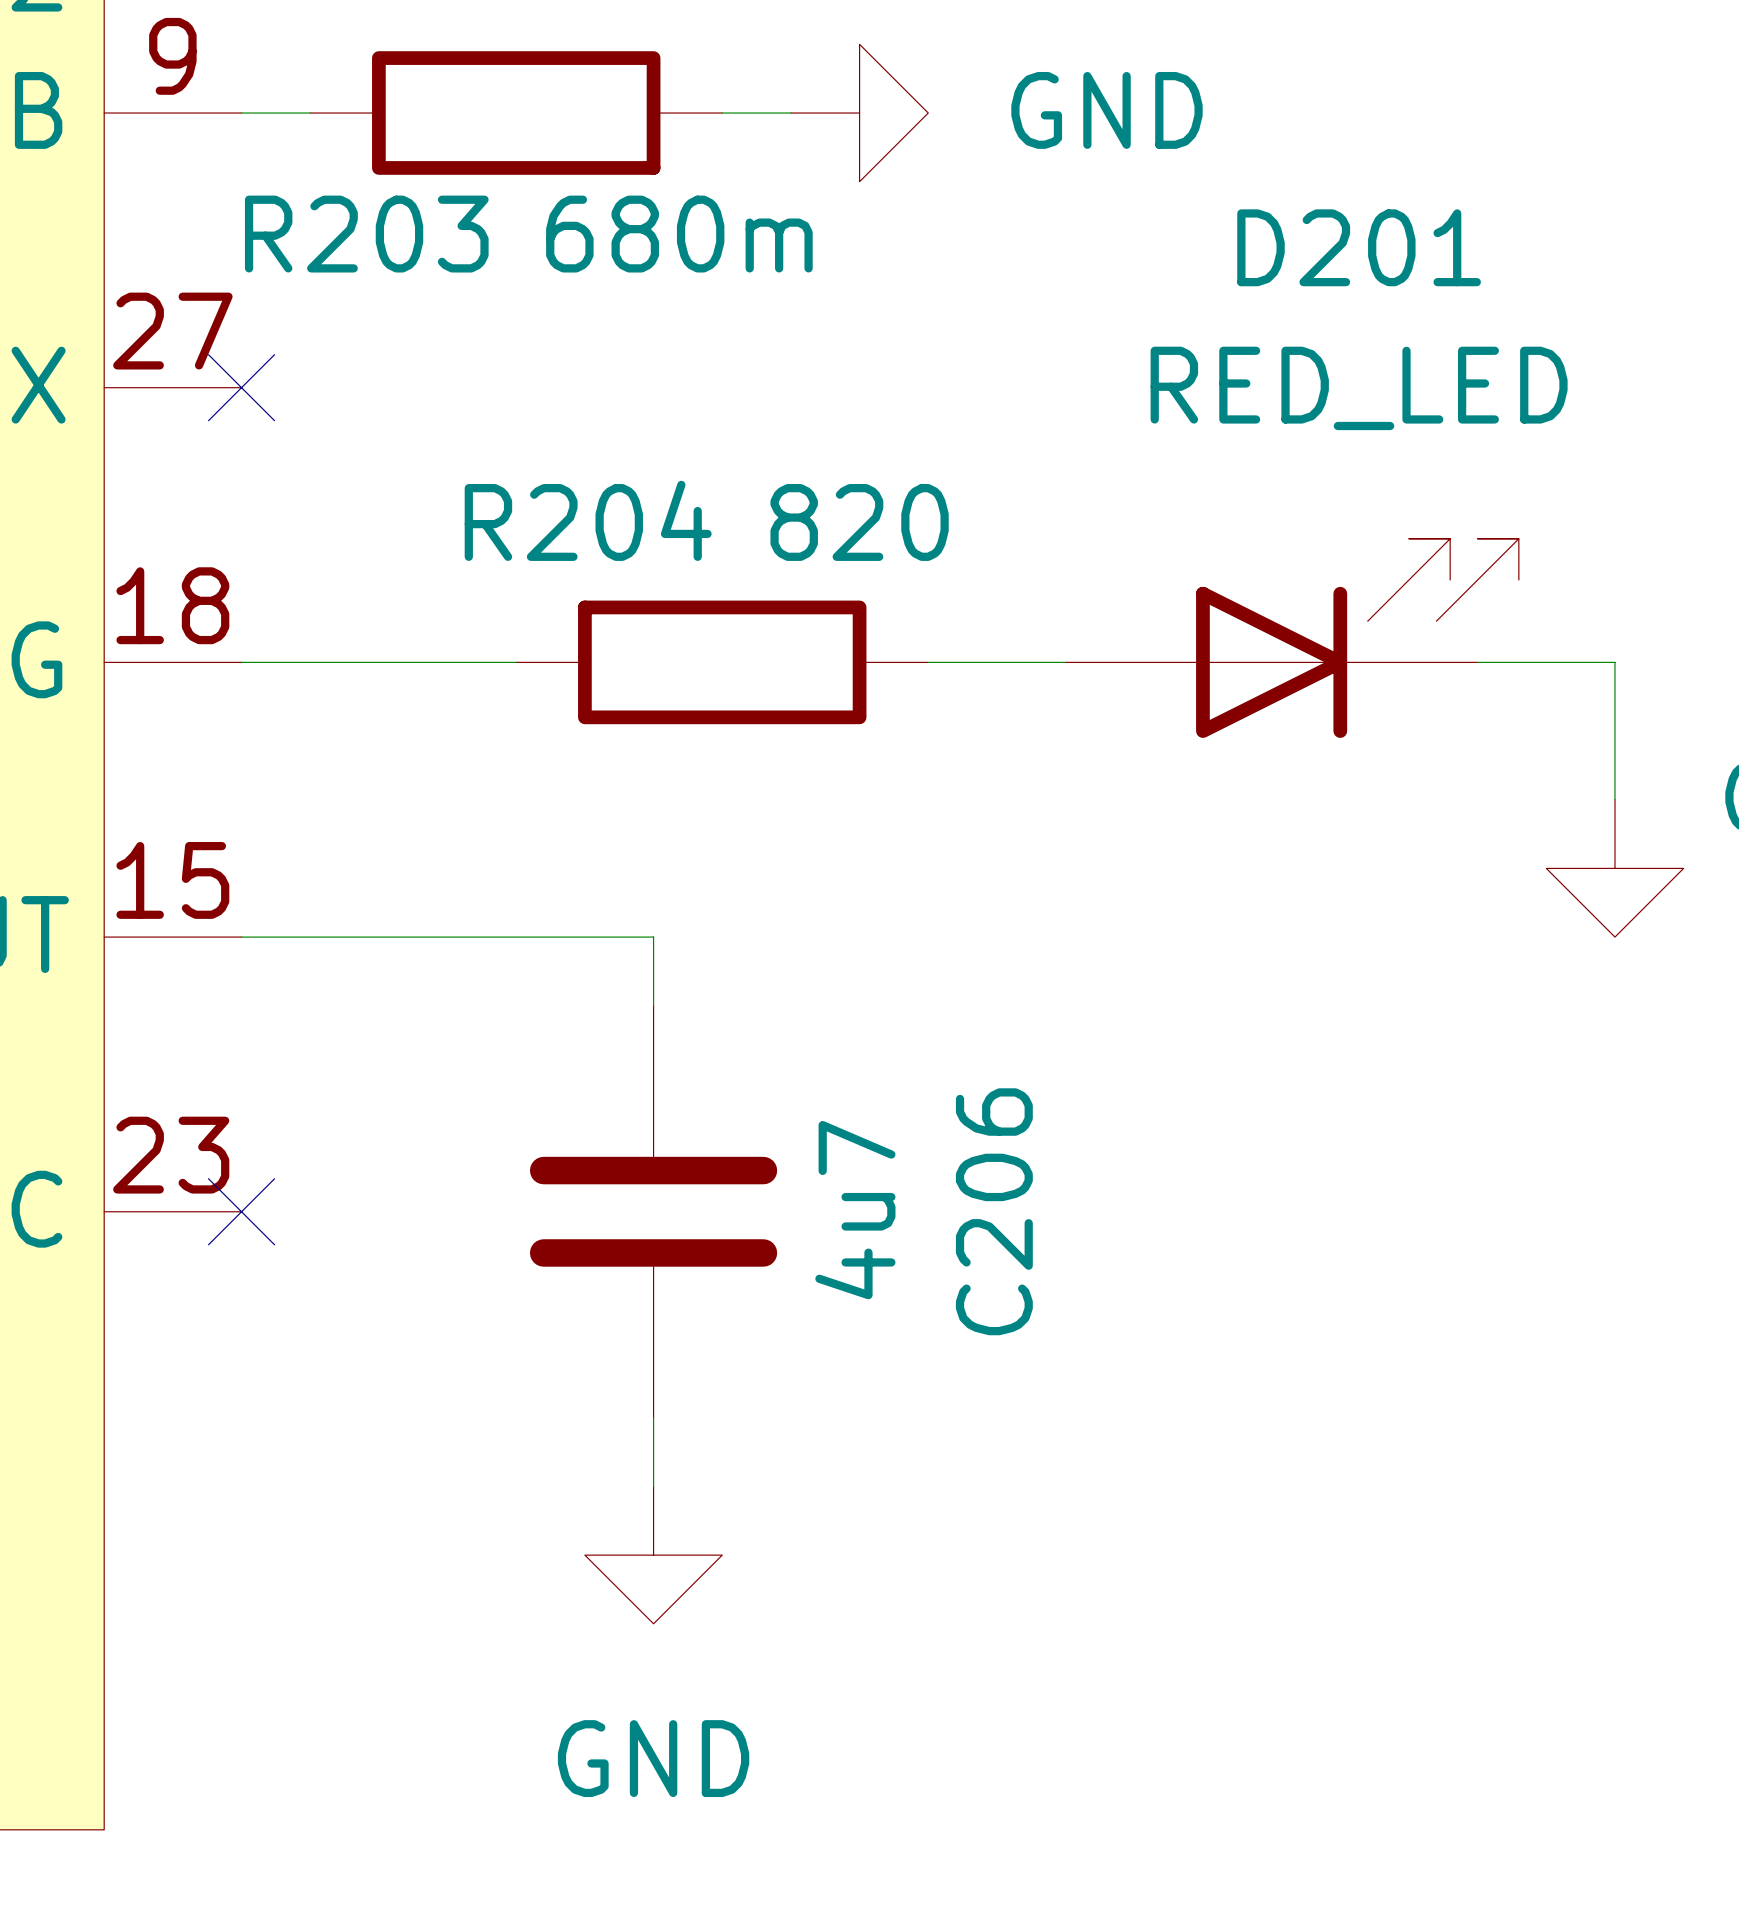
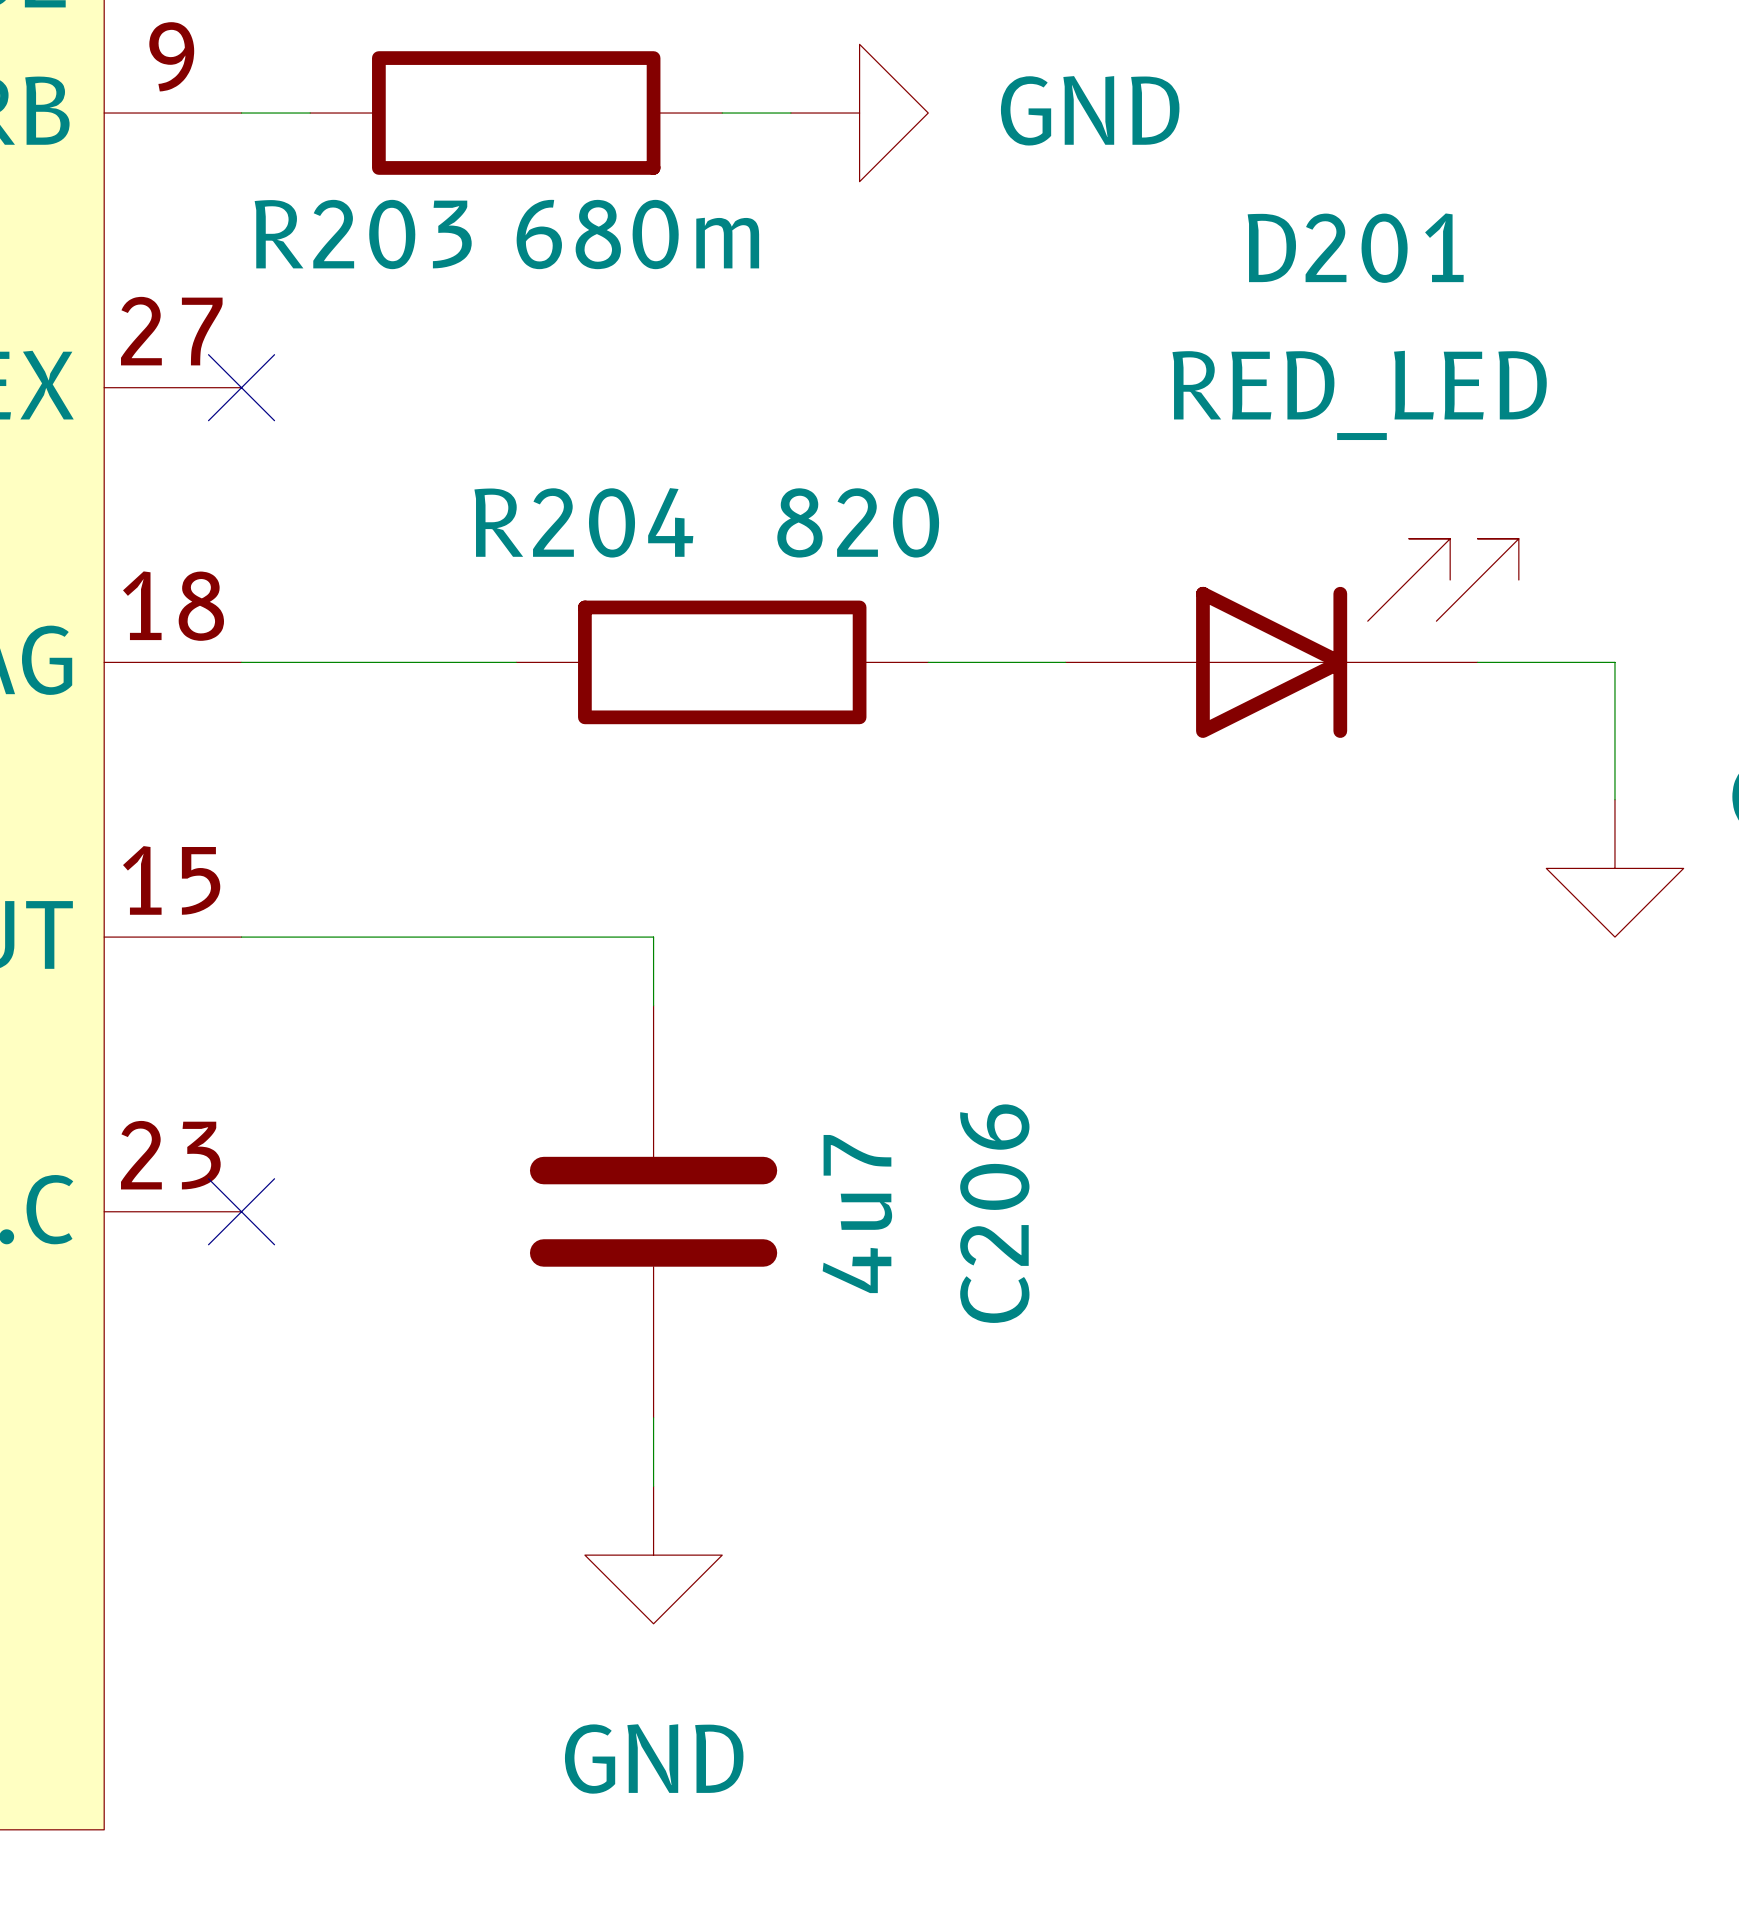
R203 value position: 680m (679, 234) -> 680m (637, 234)

